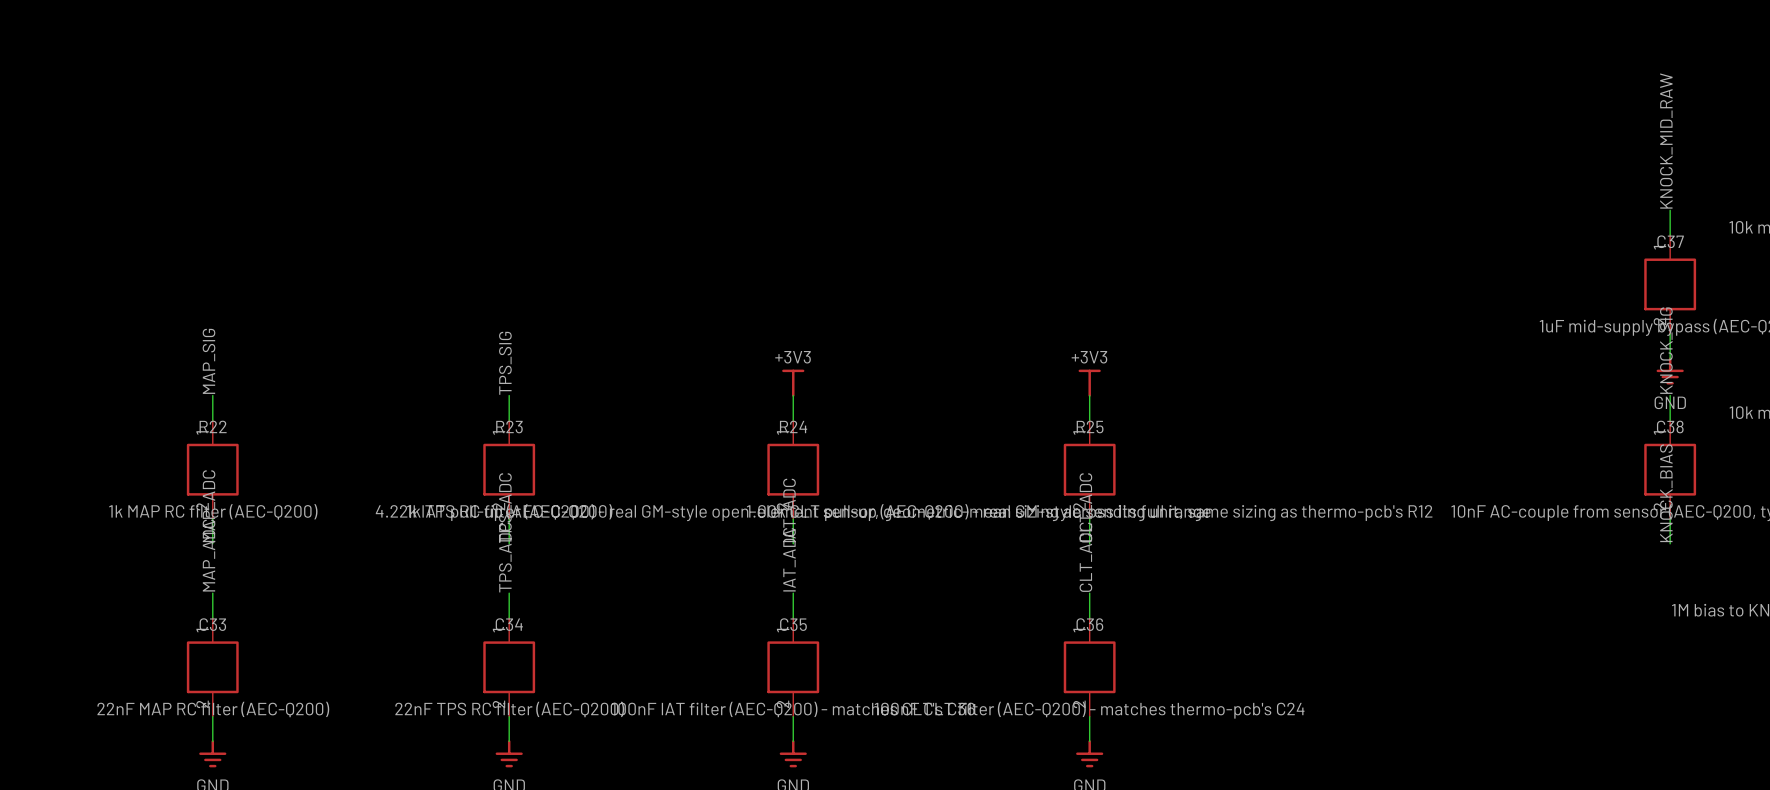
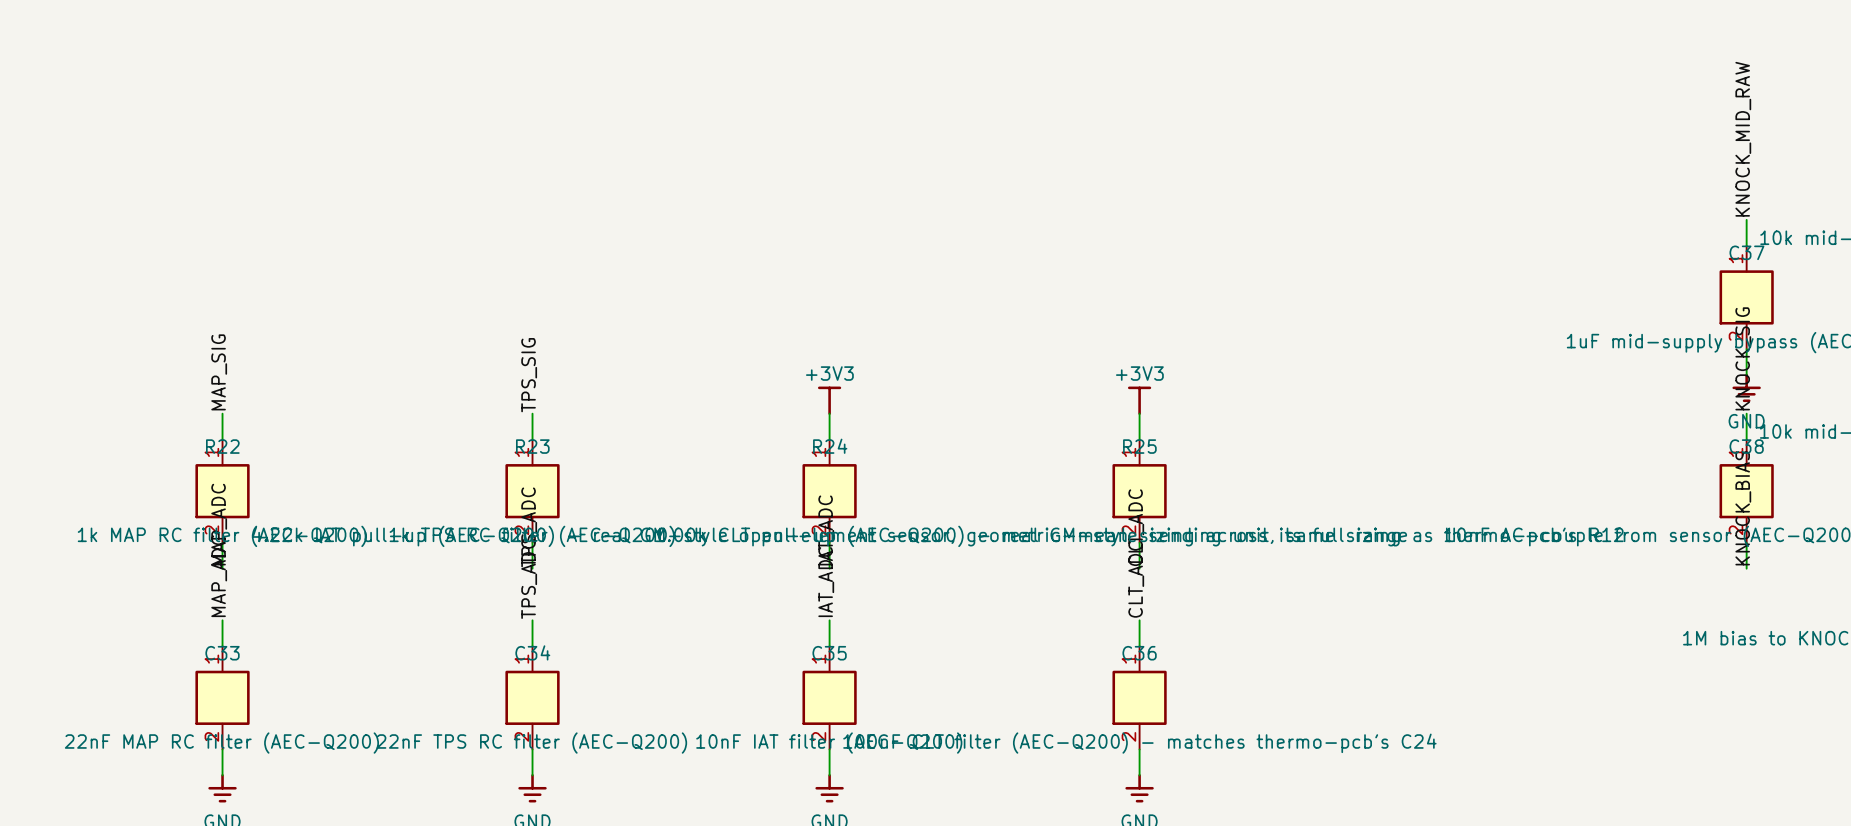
C35 value: 100nF IAT filter (AEC-Q200) - matches CLT's C36 (793, 709) -> 10nF IAT filter (AEC-Q200) (829, 743)

